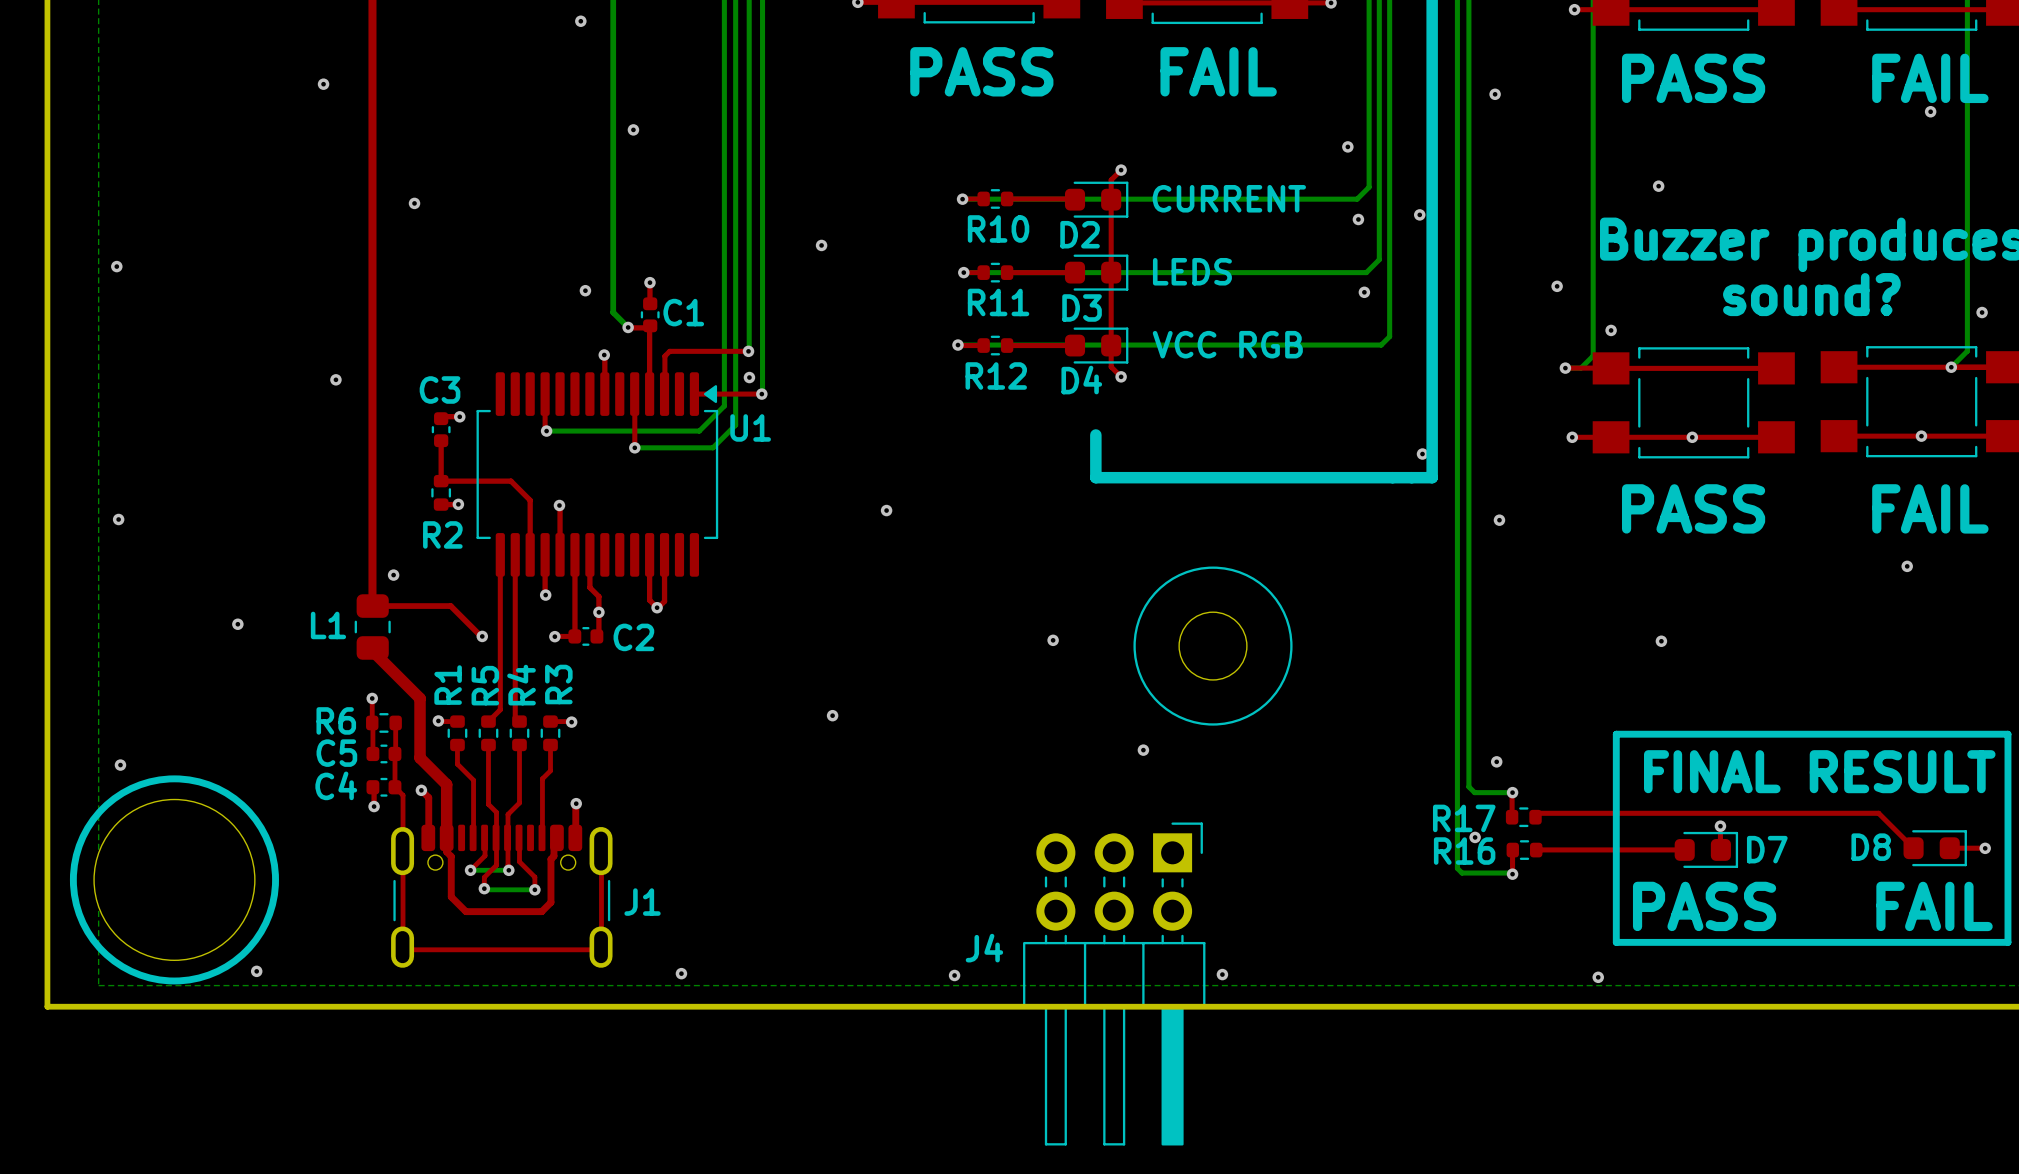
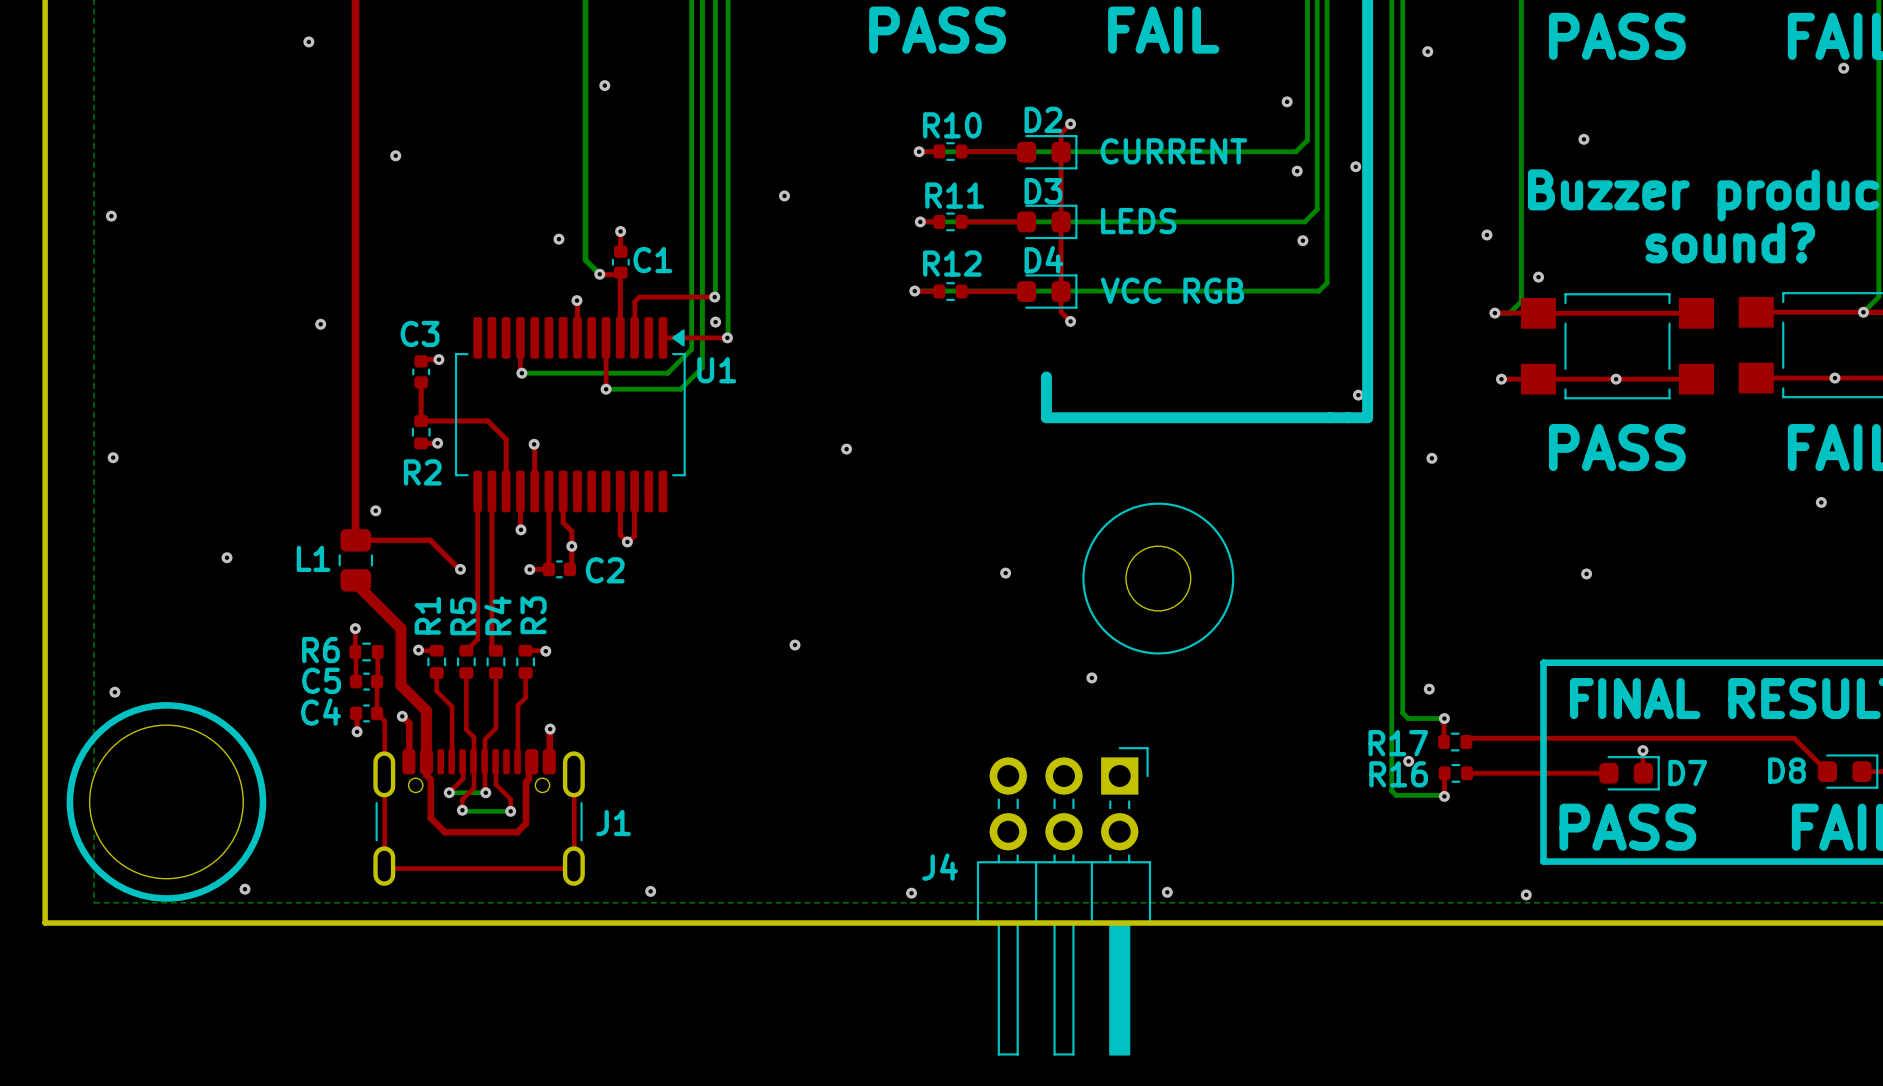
R10 name position: R10 (998, 228) -> R10 (952, 125)
D2 name position: D2 (1080, 234) -> D2 (1043, 119)
R11 name position: R11 (998, 302) -> R11 (954, 195)
D3 name position: D3 (1082, 307) -> D3 (1043, 191)
R12 name position: R12 (996, 375) -> R12 (952, 263)
D4 name position: D4 (1081, 380) -> D4 (1043, 259)

